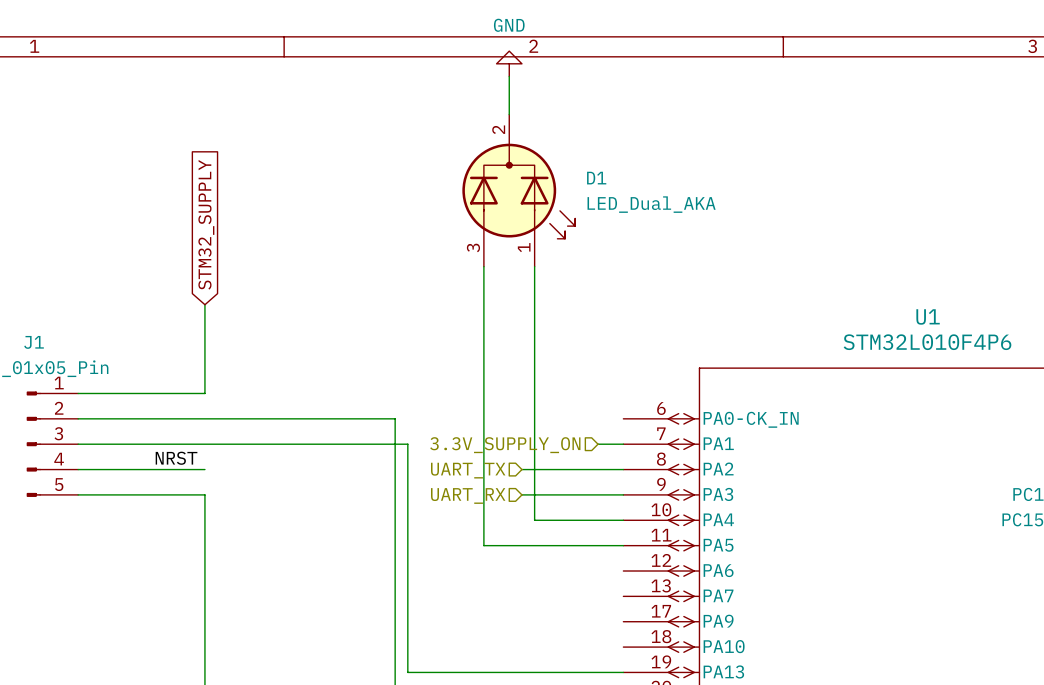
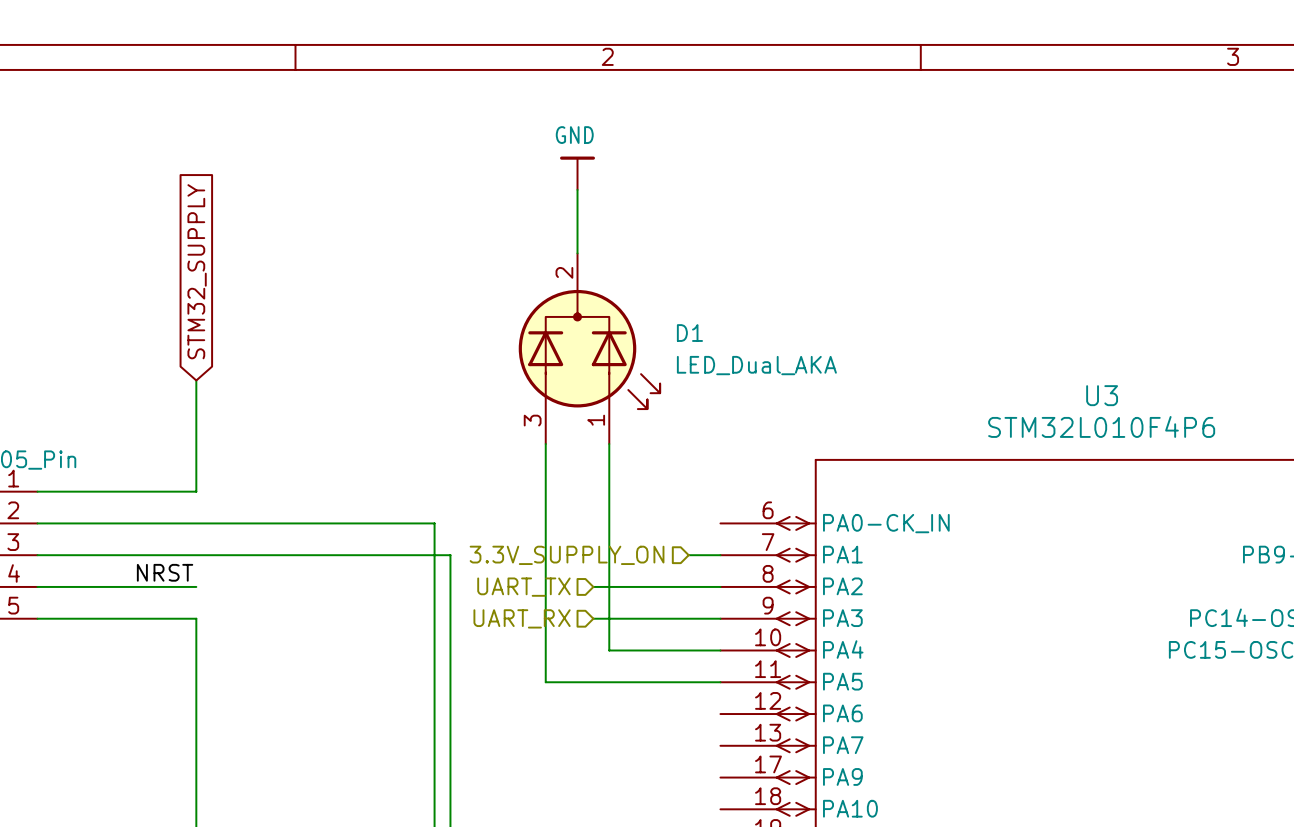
power symbol: GND (509, 63) -> none
wire: (509, 76) (509, 114) -> none
power symbol: none -> GND (577, 173)
D1 position: (518, 190) -> (589, 348)
U1 name: U1 (928, 316) -> U3 (1102, 395)

